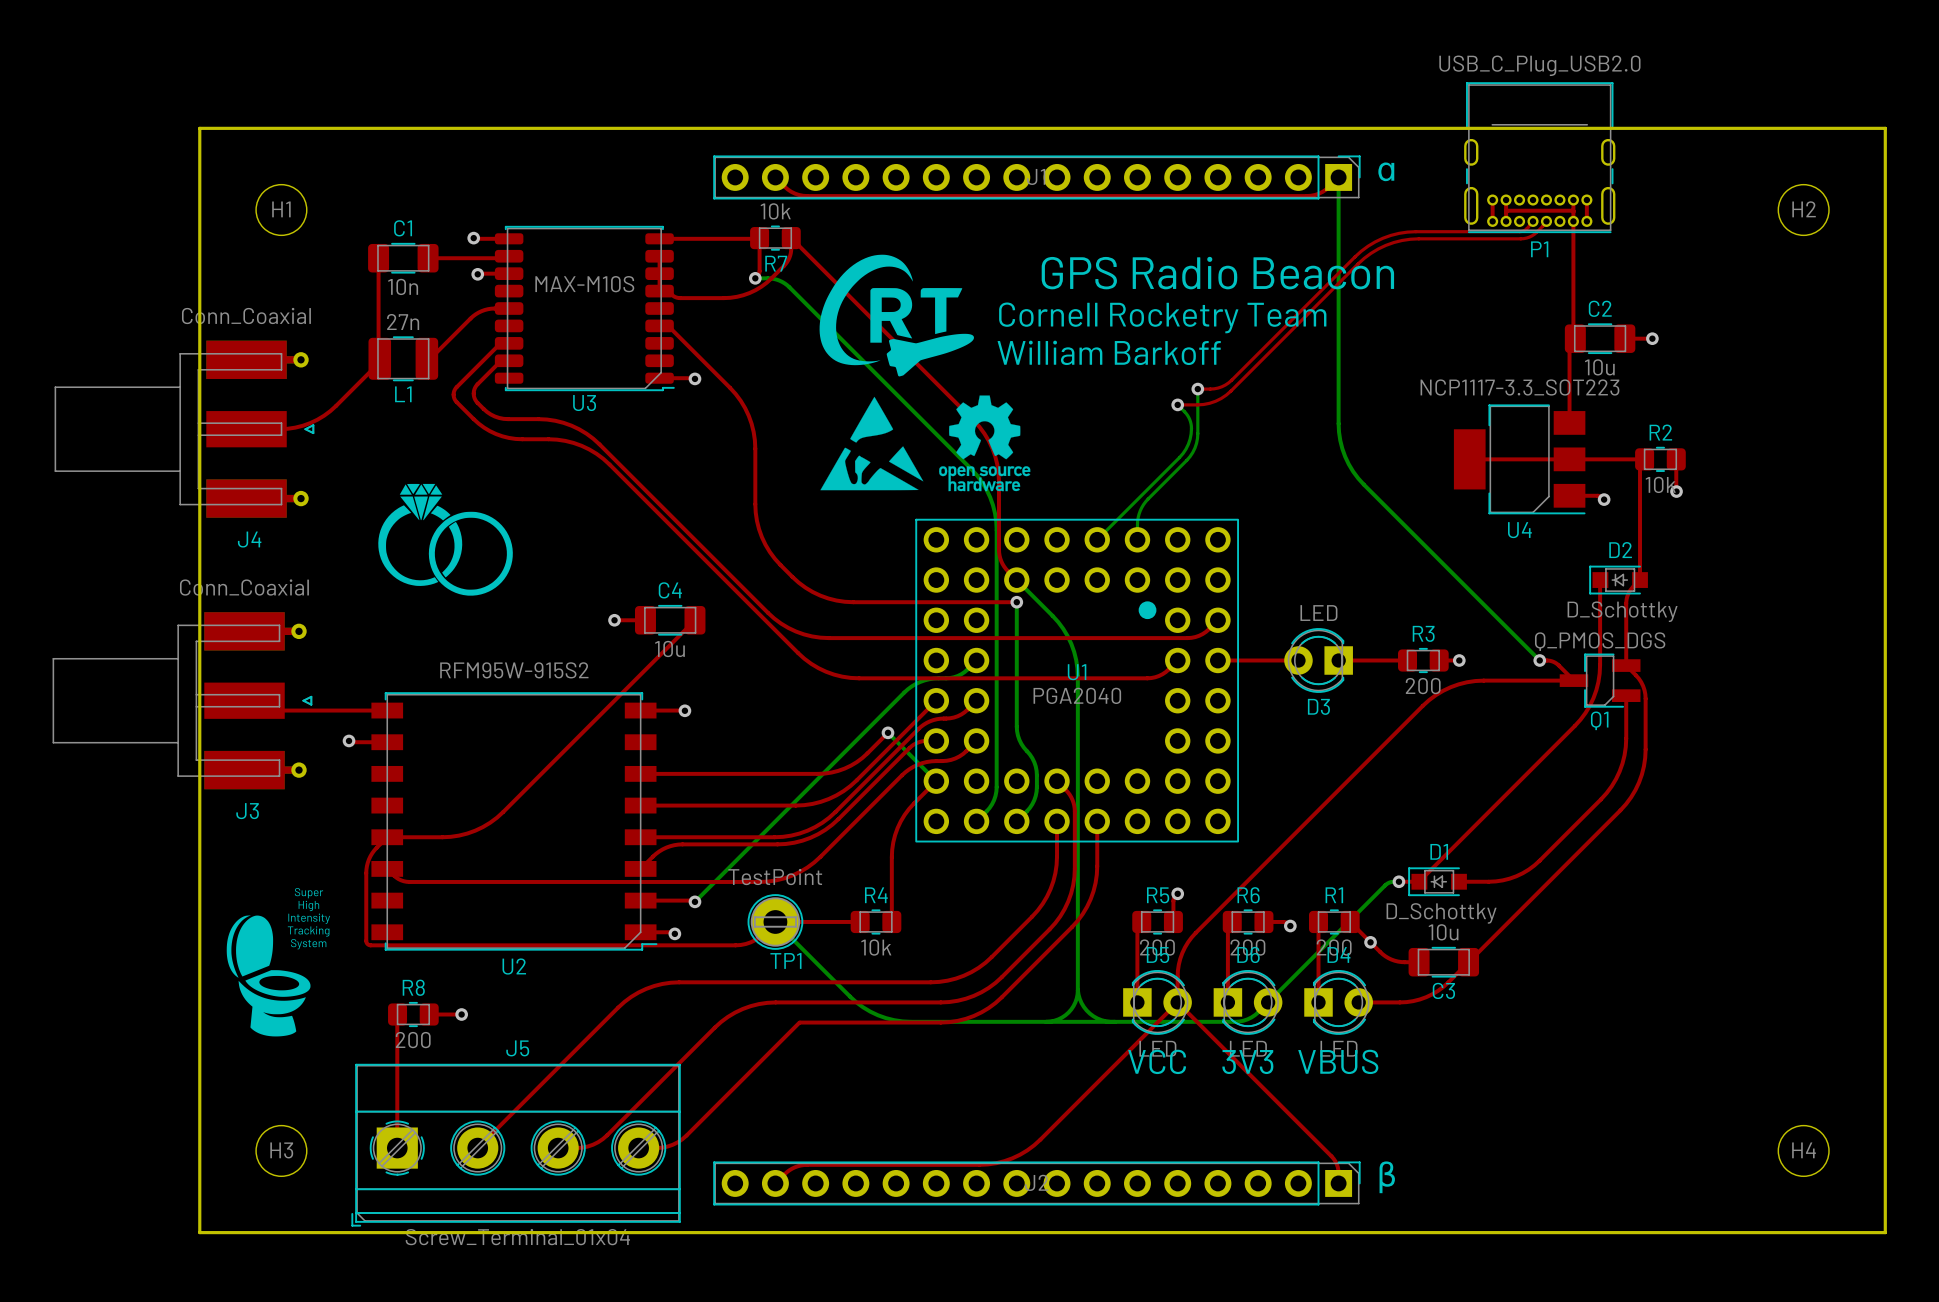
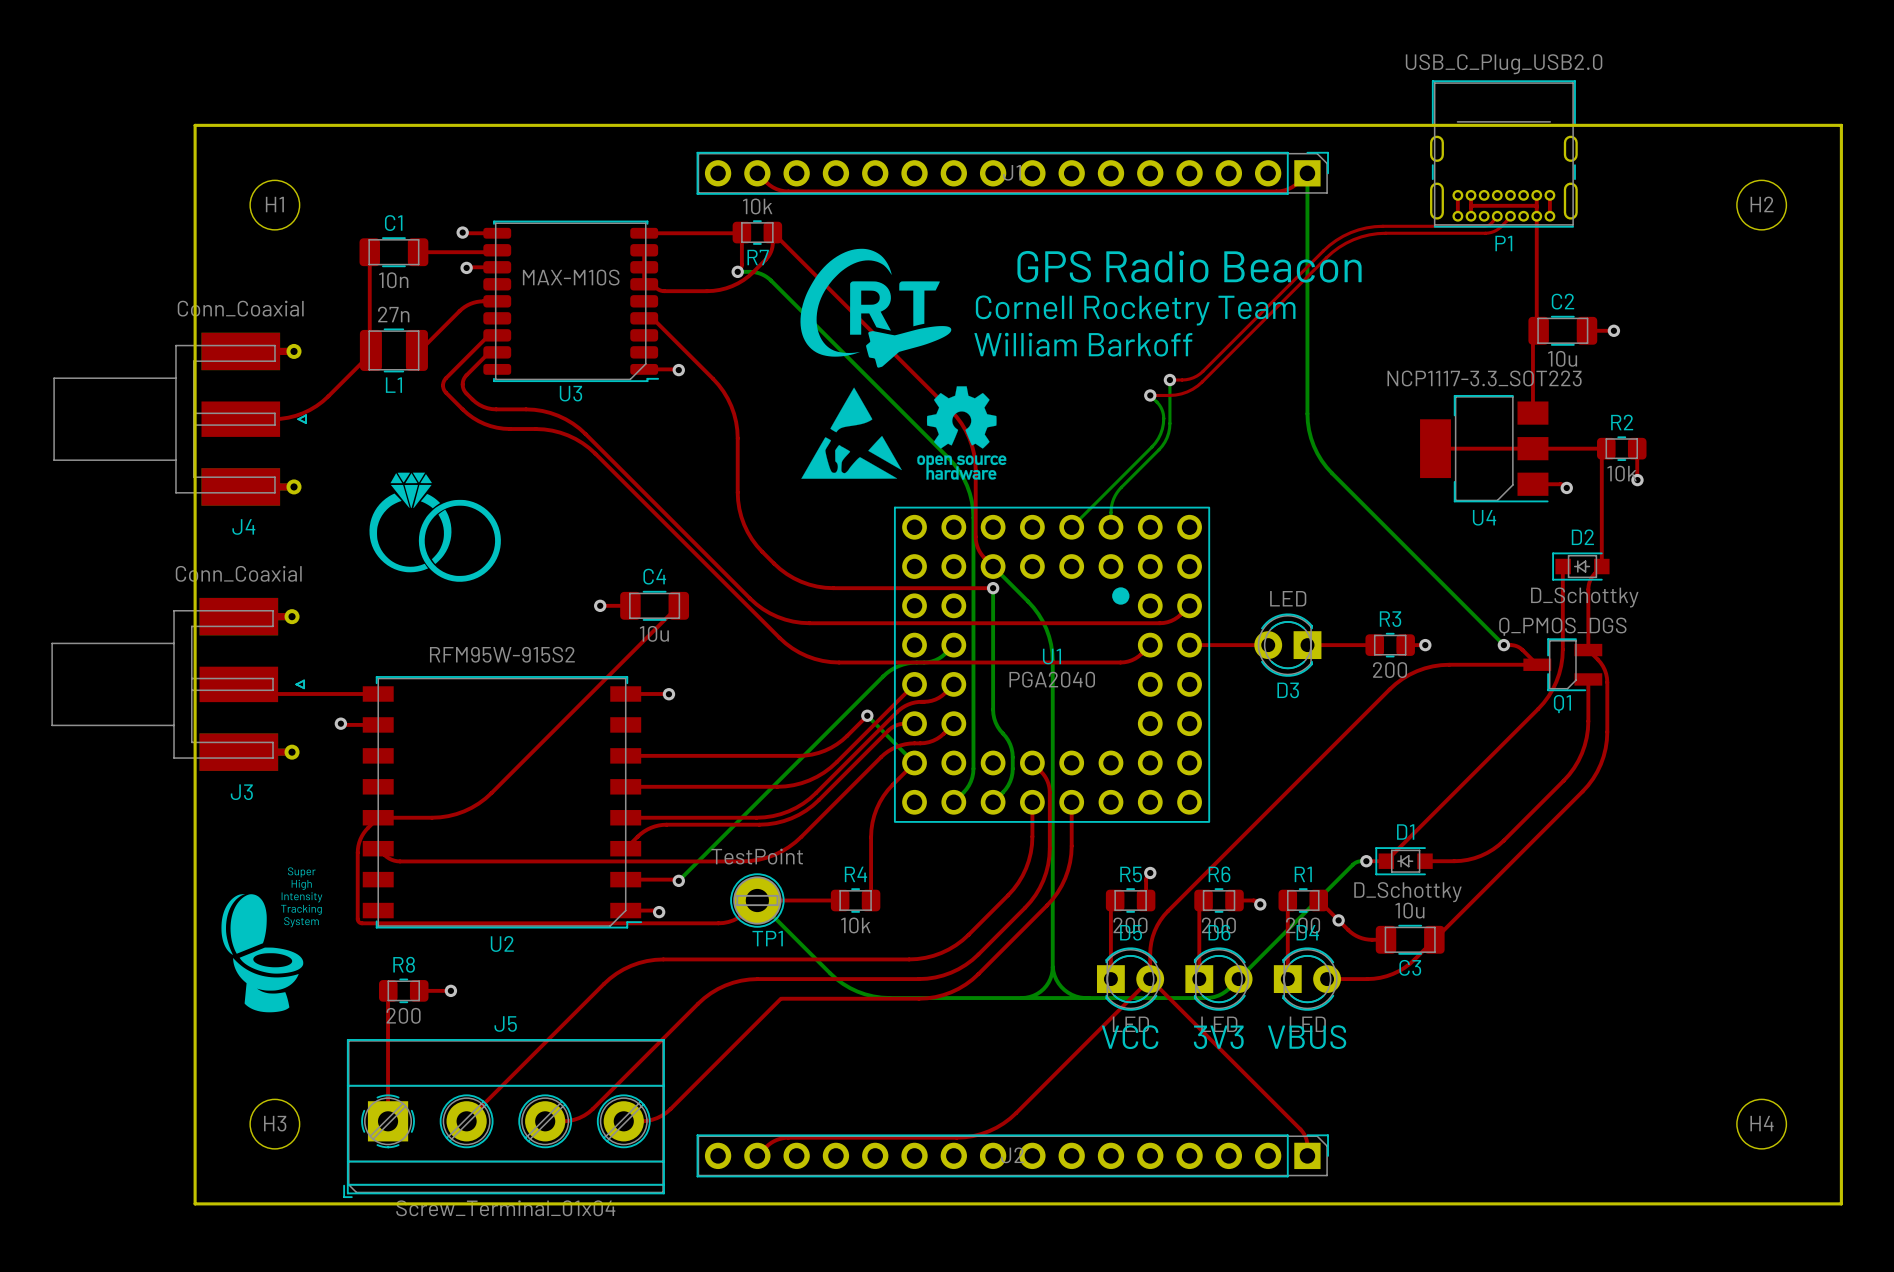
text: ɑ (1386, 171) -> none
text: β (1387, 1177) -> none

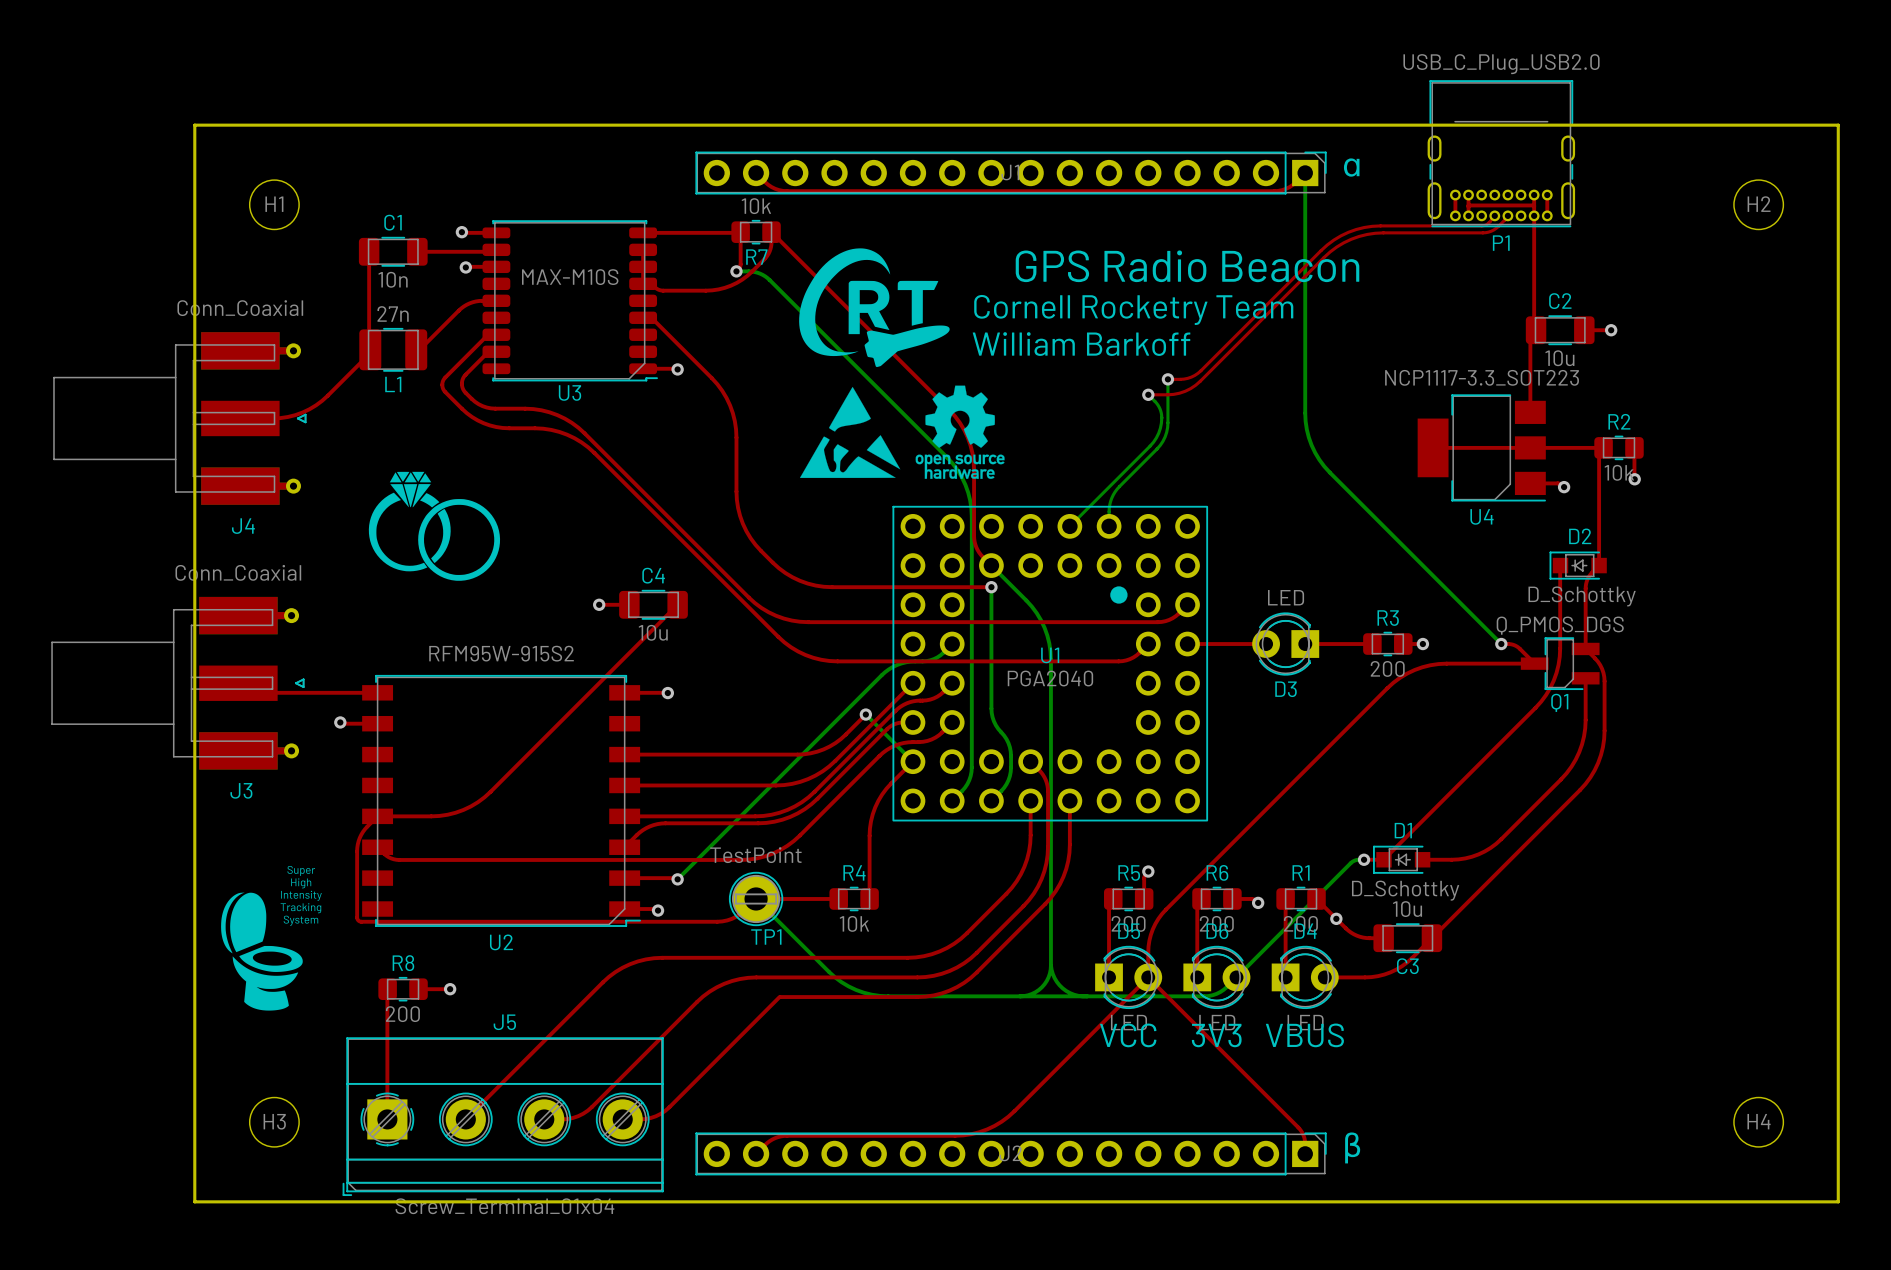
text: none -> ɑ (1351, 167)
text: none -> β (1352, 1147)

